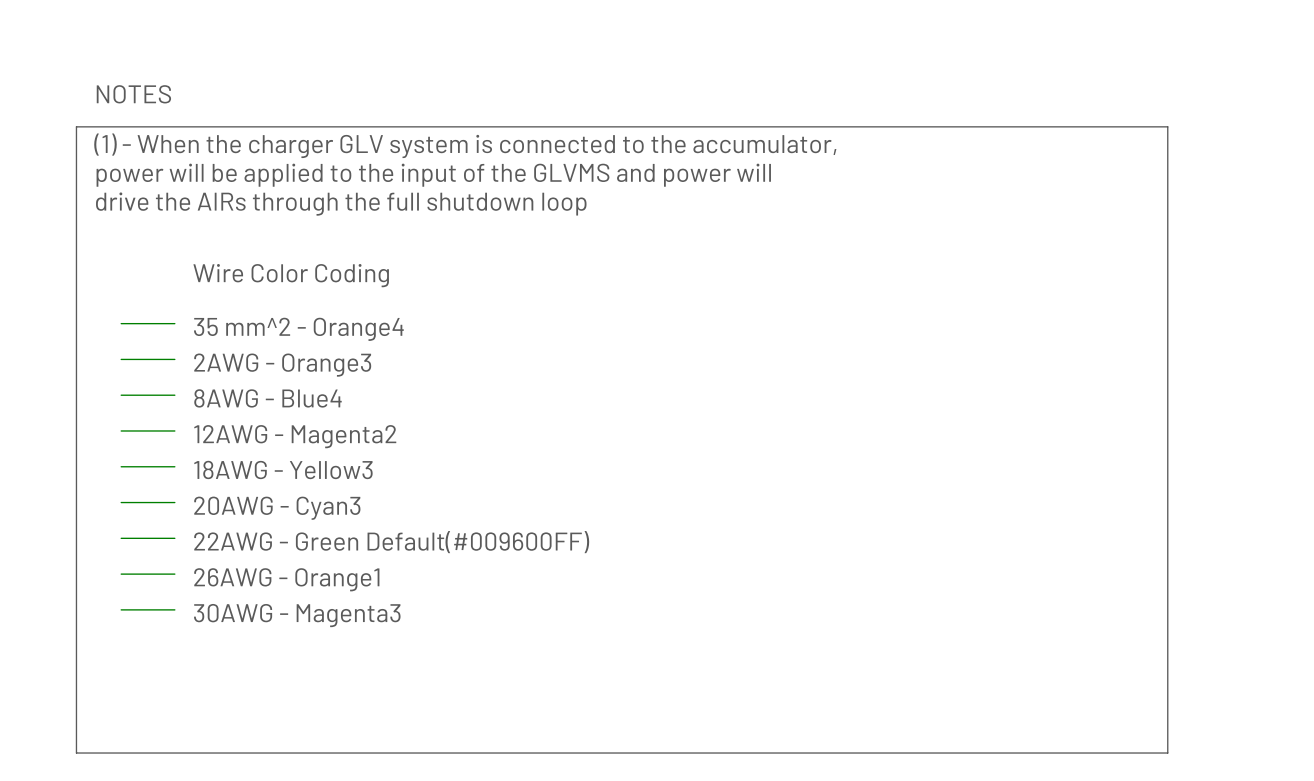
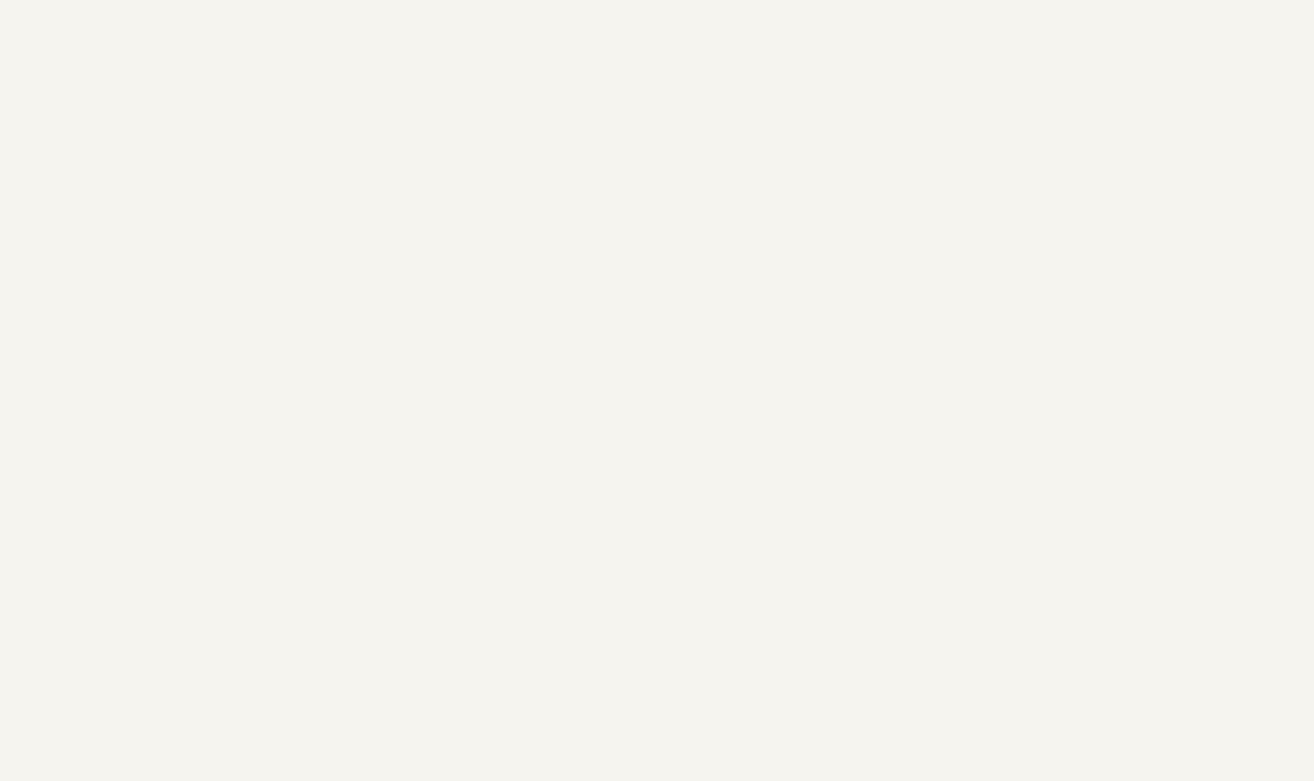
text: NOTES (133, 94) -> none
line: (76, 126) (1167, 126) (1167, 753) (76, 753) (76, 126) -> none
text: (1) - When the charger GLV system is connected to the accumulator, (465, 145) -> none
text: power will be applied to the input of the GLVMS and power will (433, 175) -> none
text: drive the AIRs through the full shutdown loop (341, 204) -> none
text: Wire Color Coding (291, 275) -> none
wire: (121, 323) (174, 323) -> none
text: 35 mm^2 - Orange4 (298, 329) -> none
wire: (121, 359) (174, 359) -> none
text: 2AWG - Orange3 (282, 365) -> none
wire: (121, 395) (174, 395) -> none
text: 8AWG - Blue4 (267, 398) -> none
wire: (121, 430) (174, 430) -> none
text: 12AWG - Magenta2 (295, 436) -> none
wire: (121, 466) (174, 466) -> none
text: 18AWG - Yellow3 (283, 469) -> none
wire: (121, 502) (174, 502) -> none
text: 20AWG - Cyan3 (277, 508) -> none
wire: (121, 538) (174, 538) -> none
text: 22AWG - Green Default(#009600FF) (391, 542) -> none
wire: (121, 574) (174, 574) -> none
text: 26AWG - Orange1 (286, 579) -> none
wire: (121, 609) (174, 609) -> none
text: 30AWG - Magenta3 (297, 615) -> none

